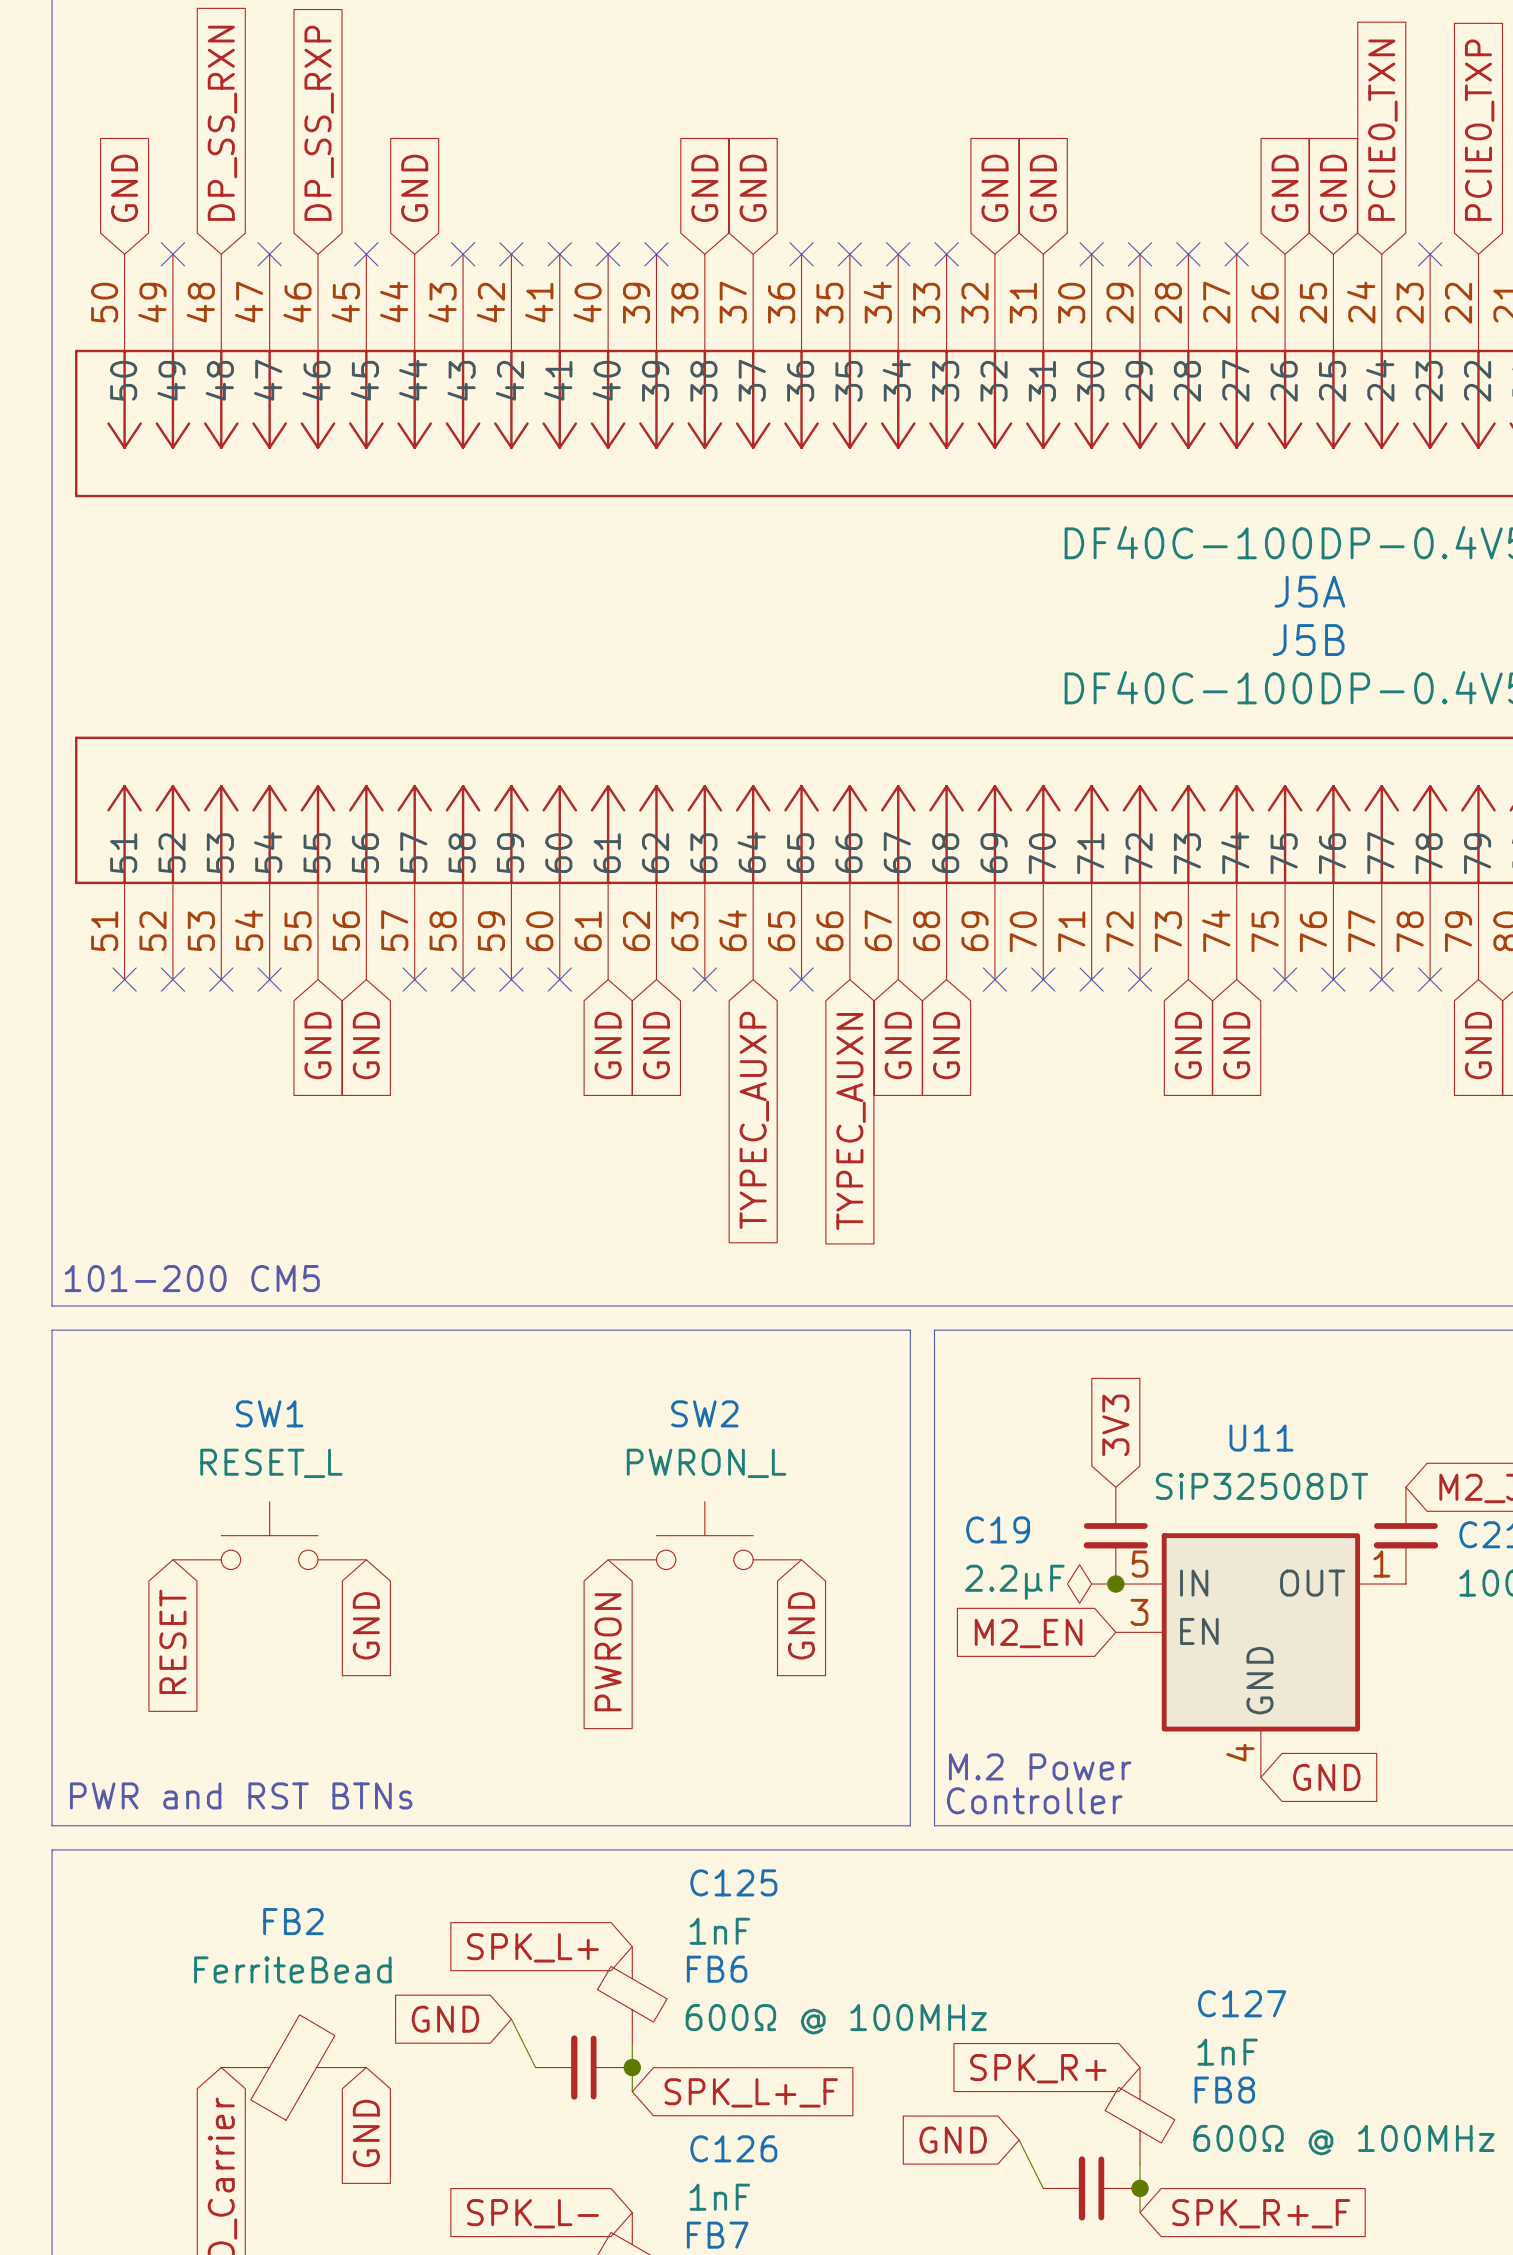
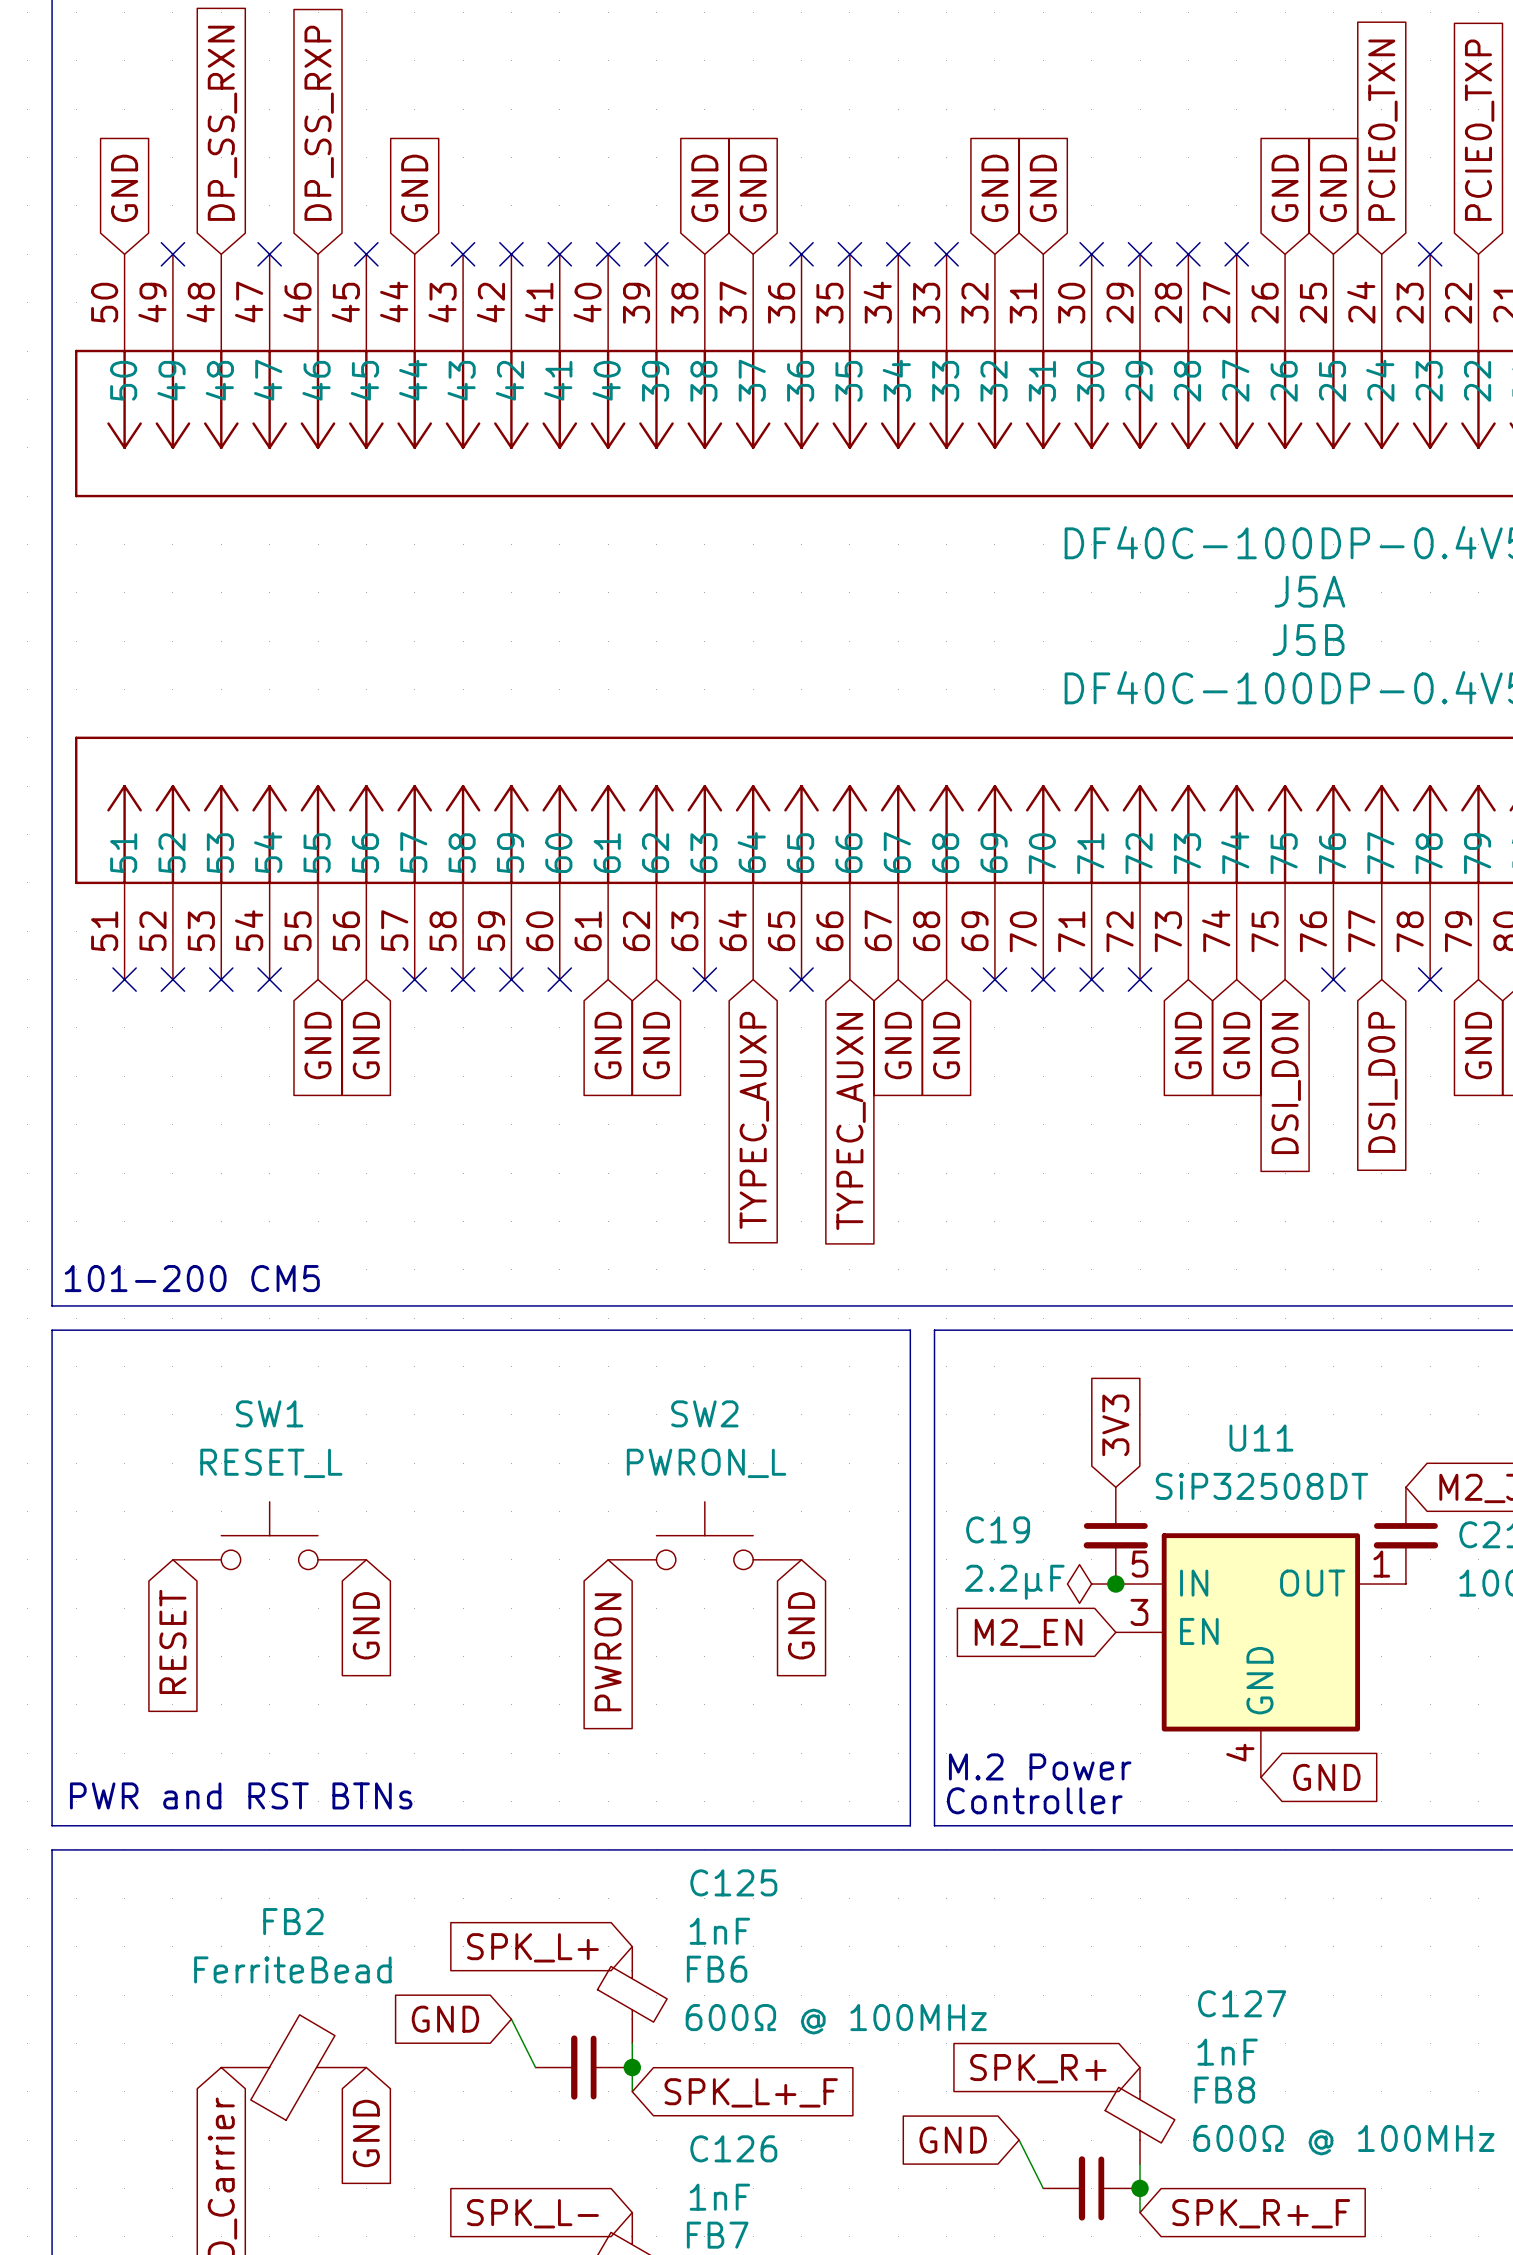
no-connect mark: (1285, 979) -> none
no-connect mark: (1381, 979) -> none
global label: none -> DSI_D0P (1382, 1082)
global label: none -> DSI_D0N (1286, 1083)

